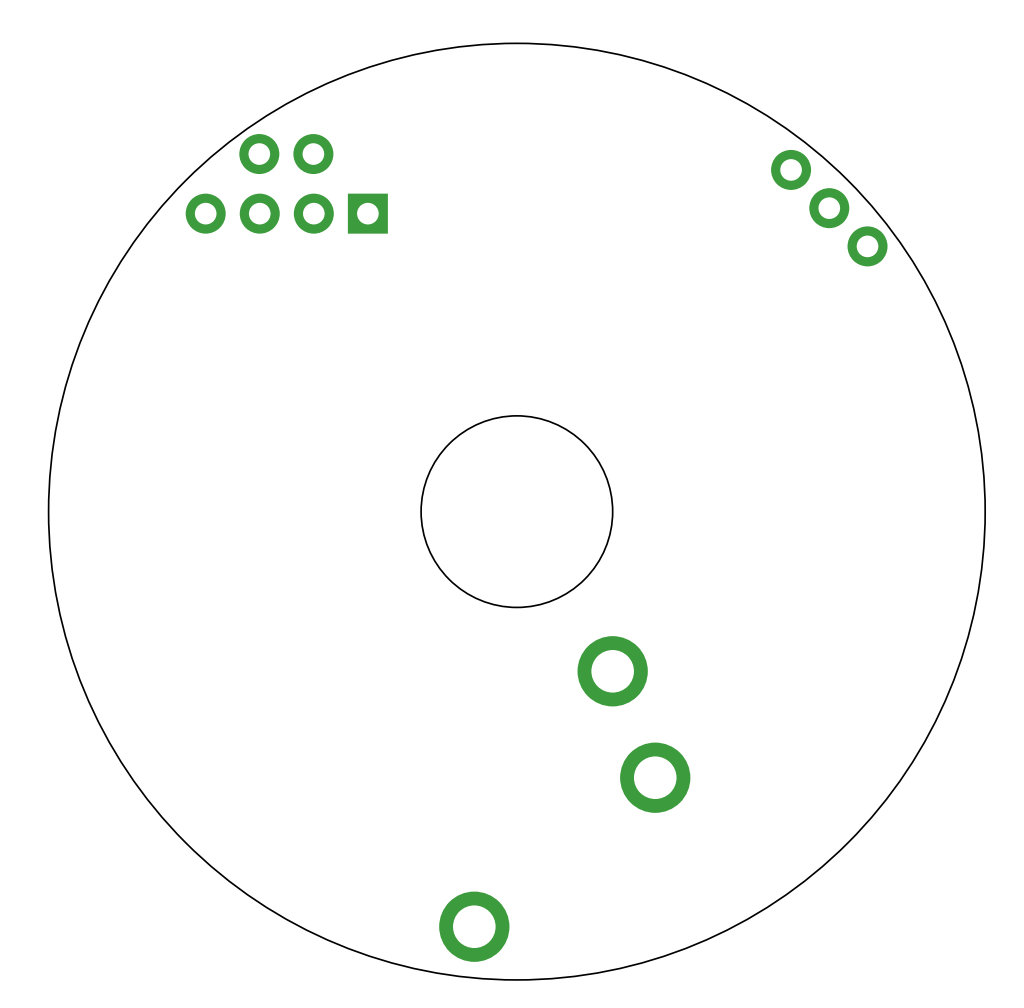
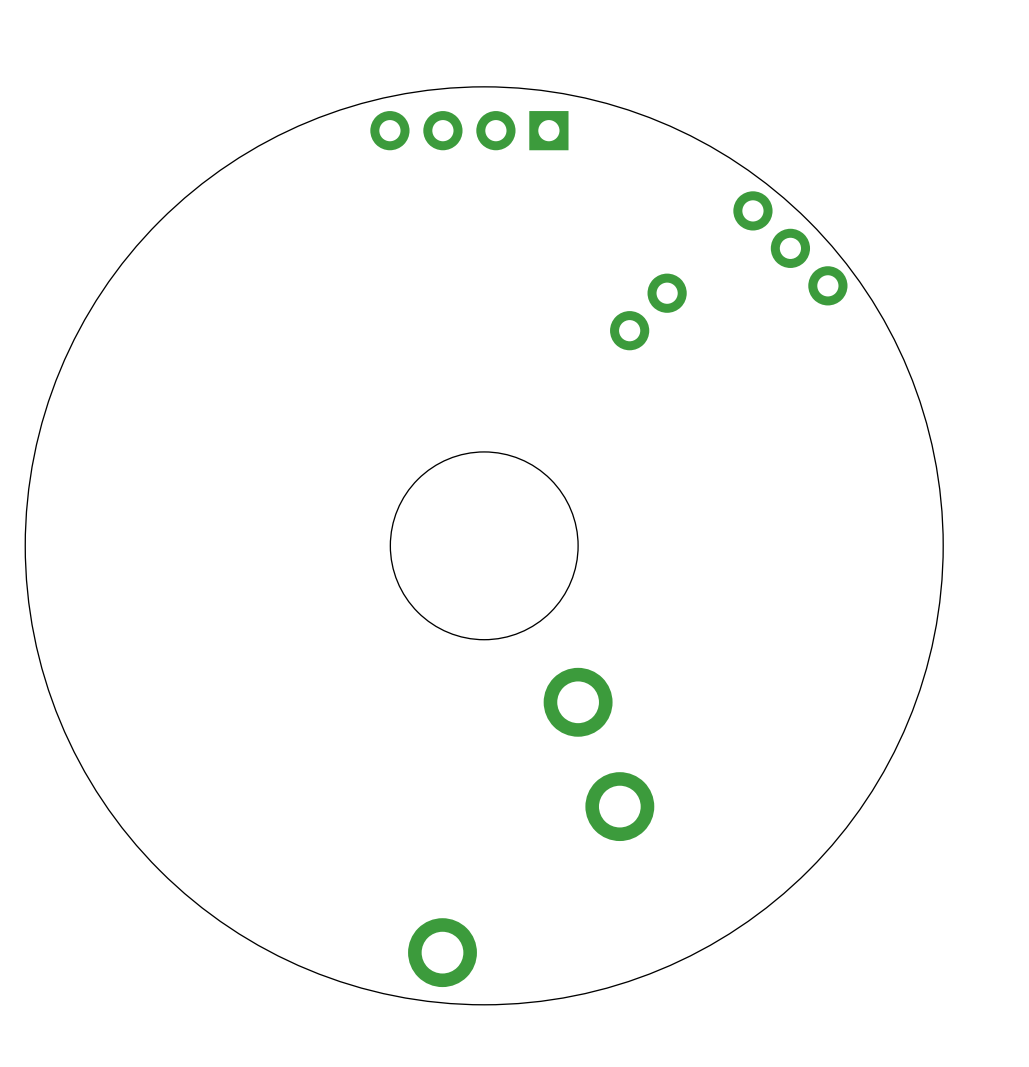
part: (286, 154) -> none
part position: (286, 213) -> (469, 130)
part: none -> (648, 311)

